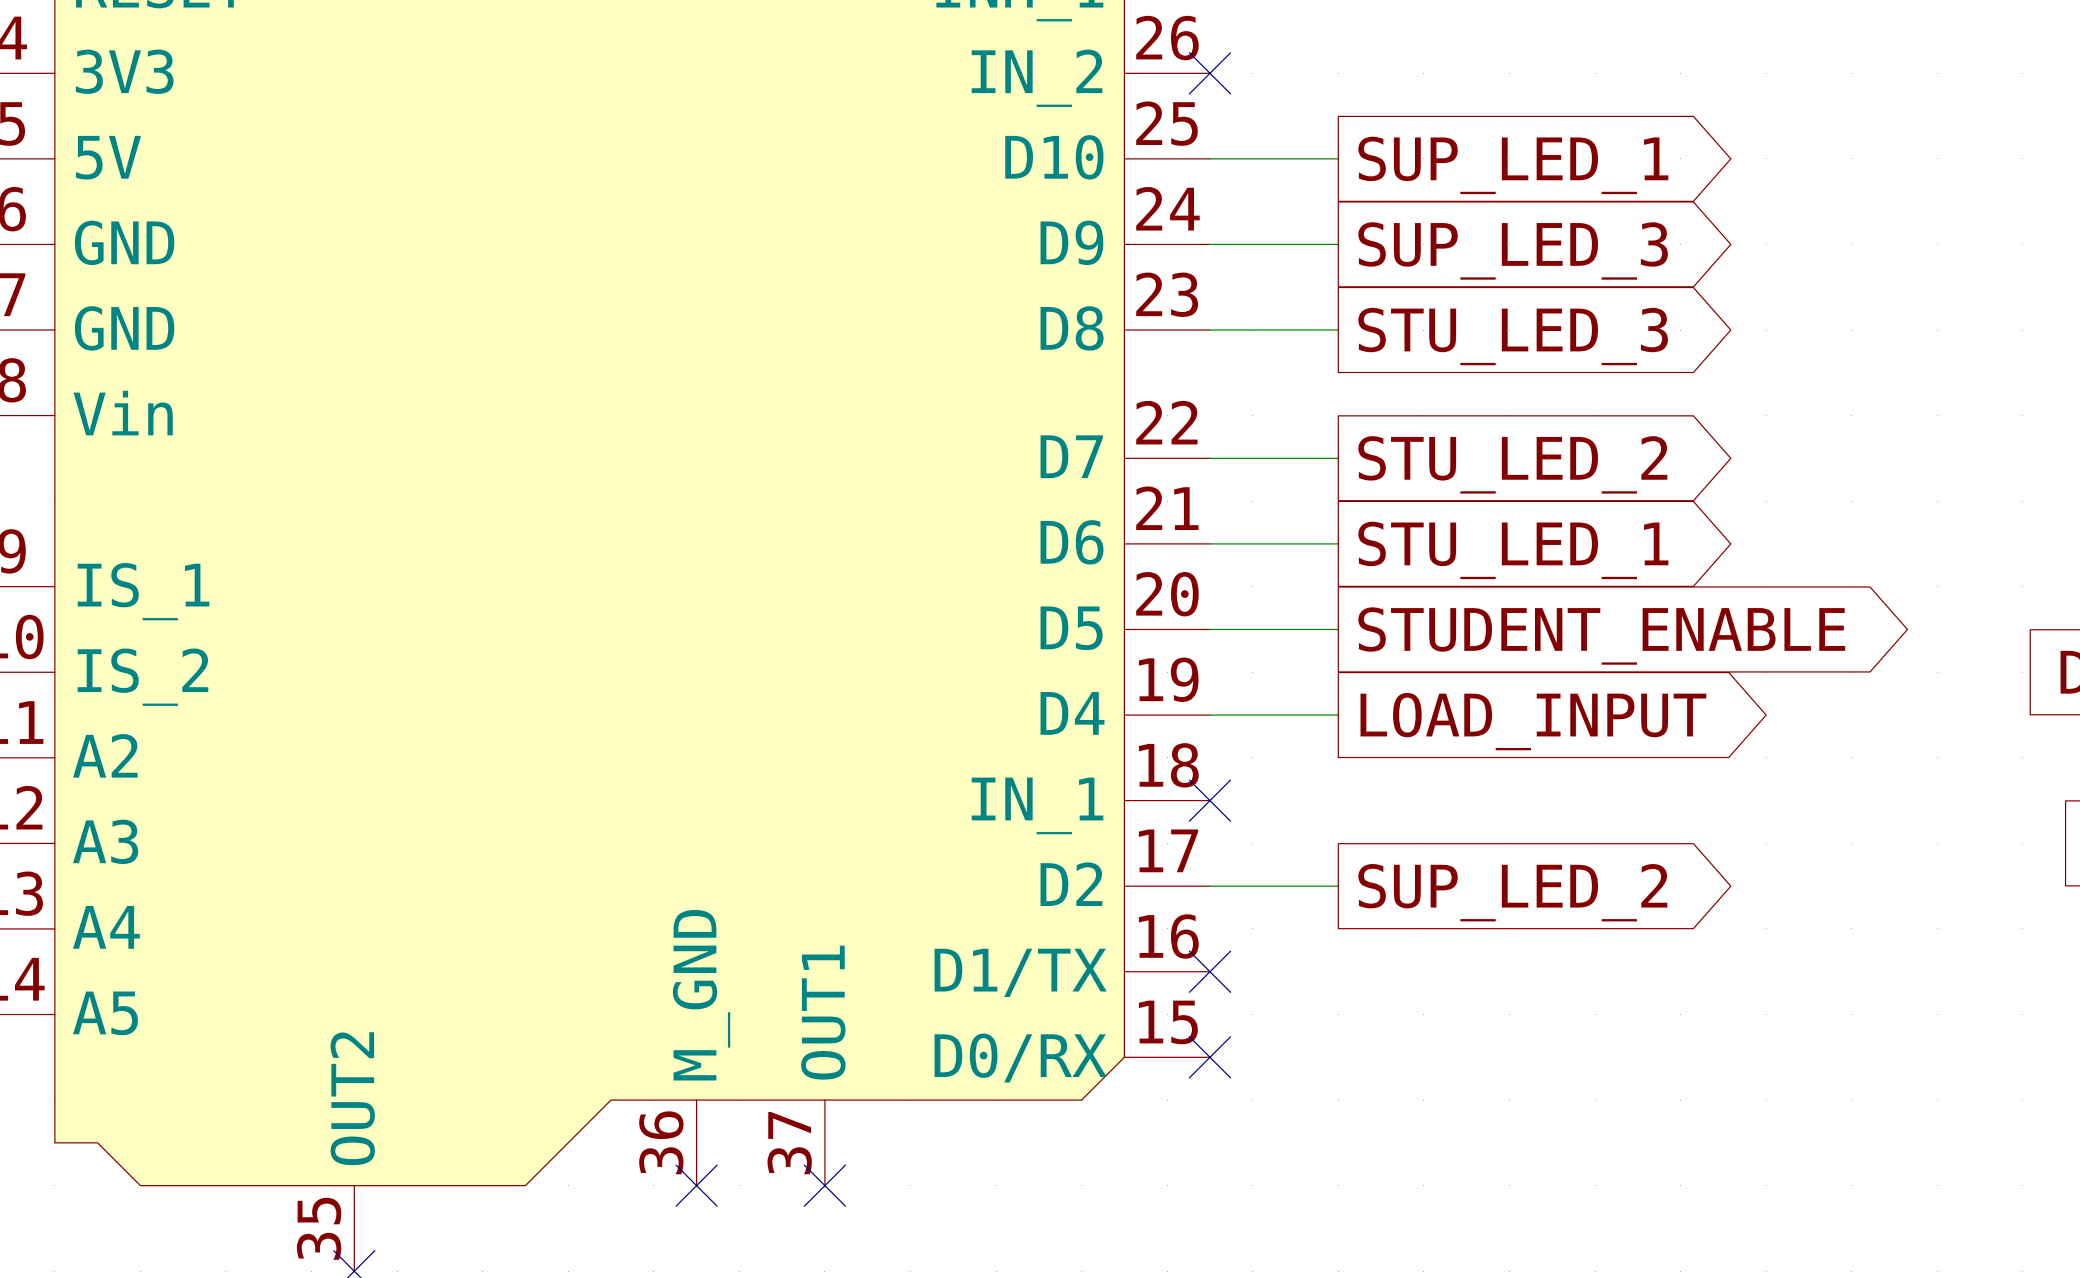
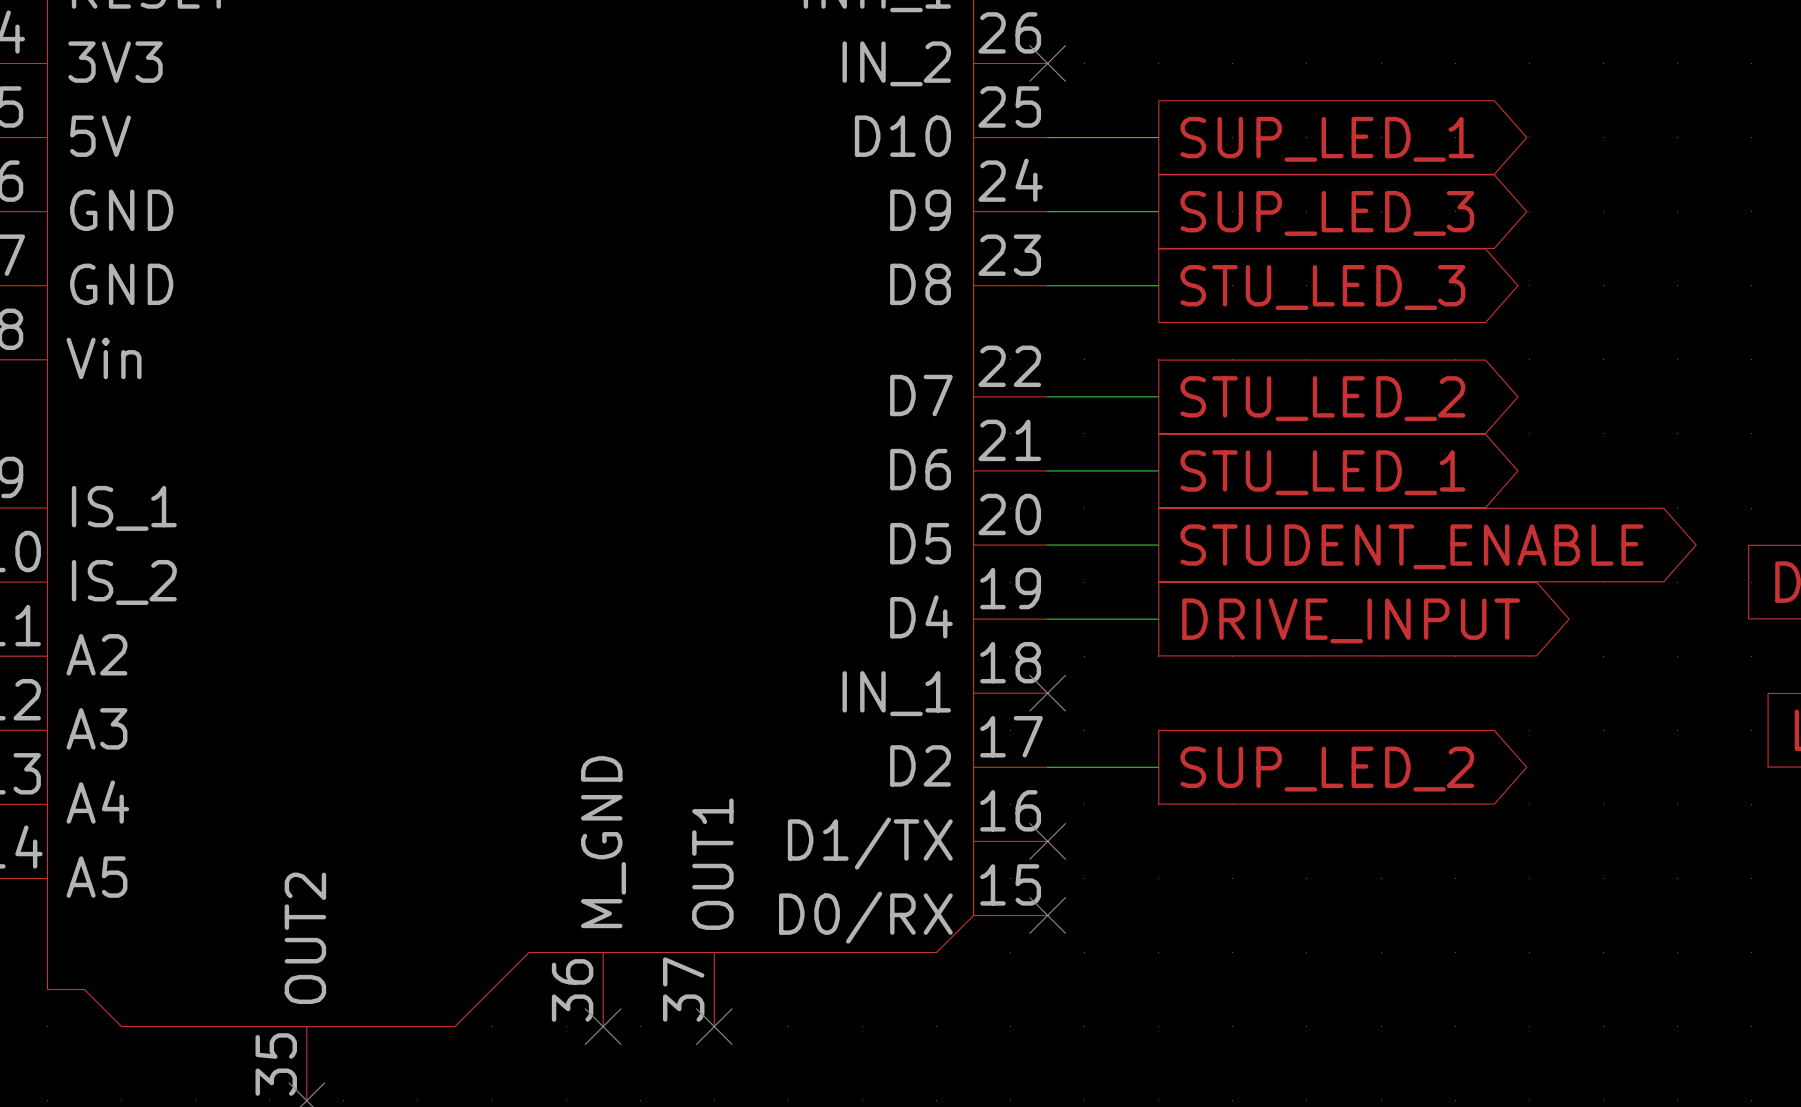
global label: LOAD_INPUT (1533, 721) -> DRIVE_INPUT (1351, 620)

